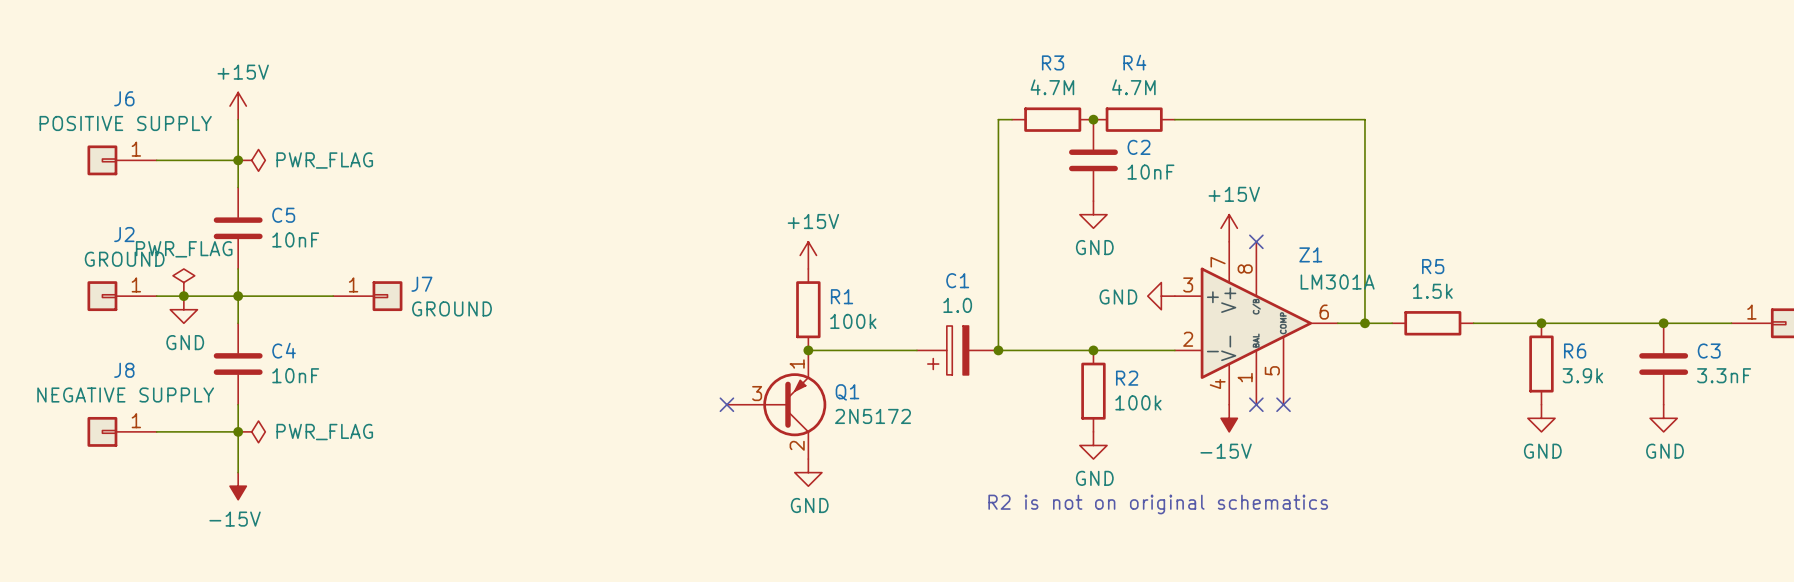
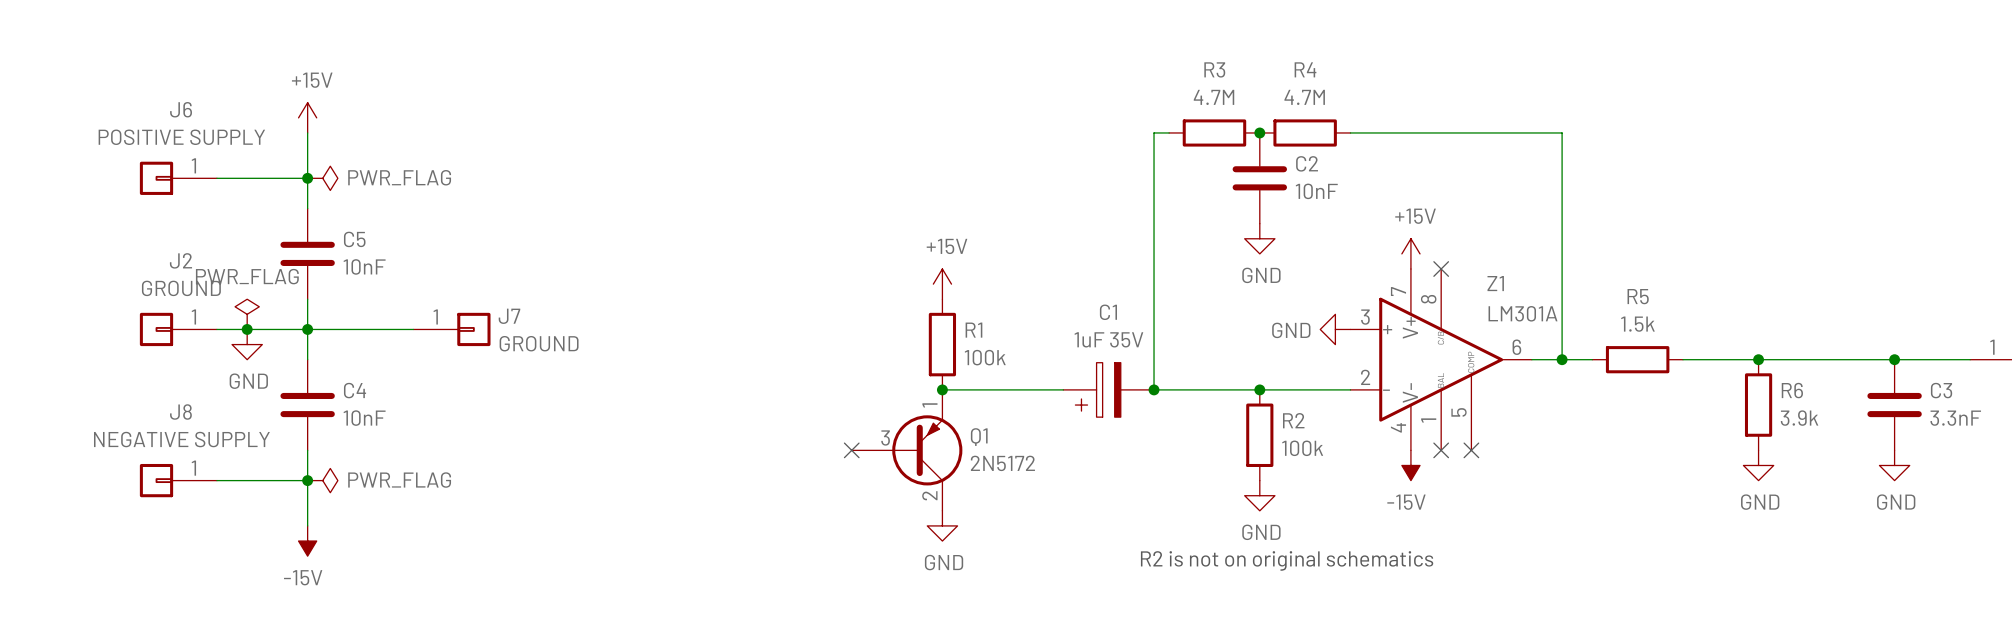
C1 value: 1.0 (957, 305) -> 1uF 35V (1108, 339)

